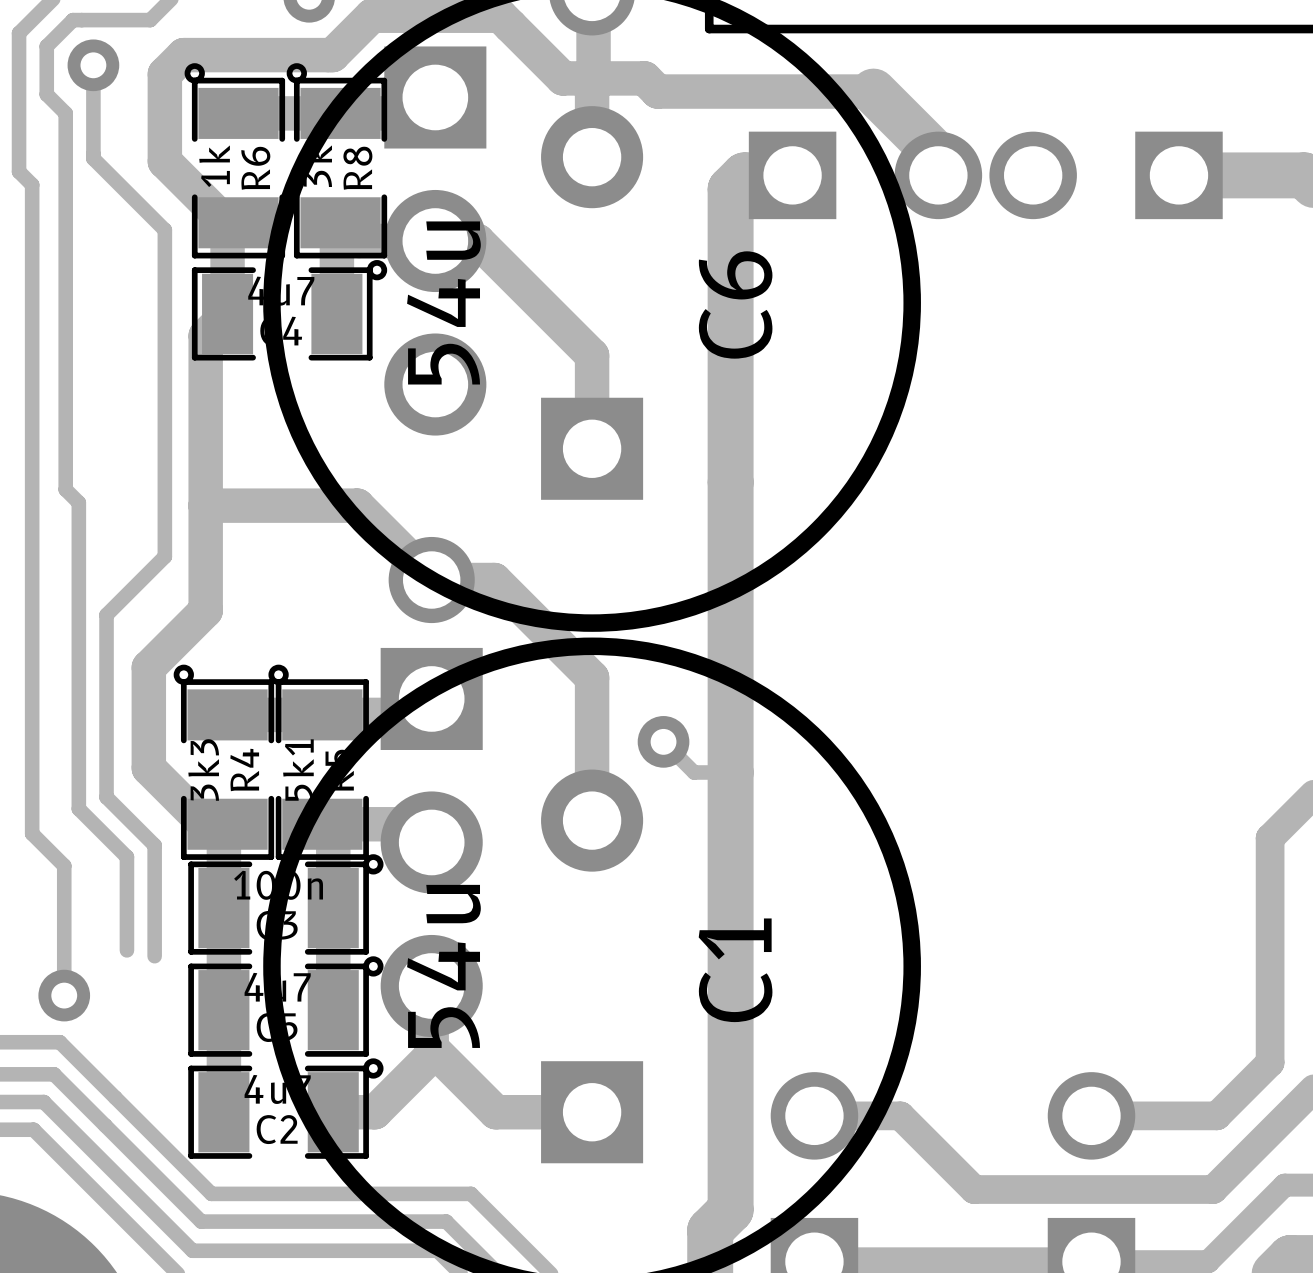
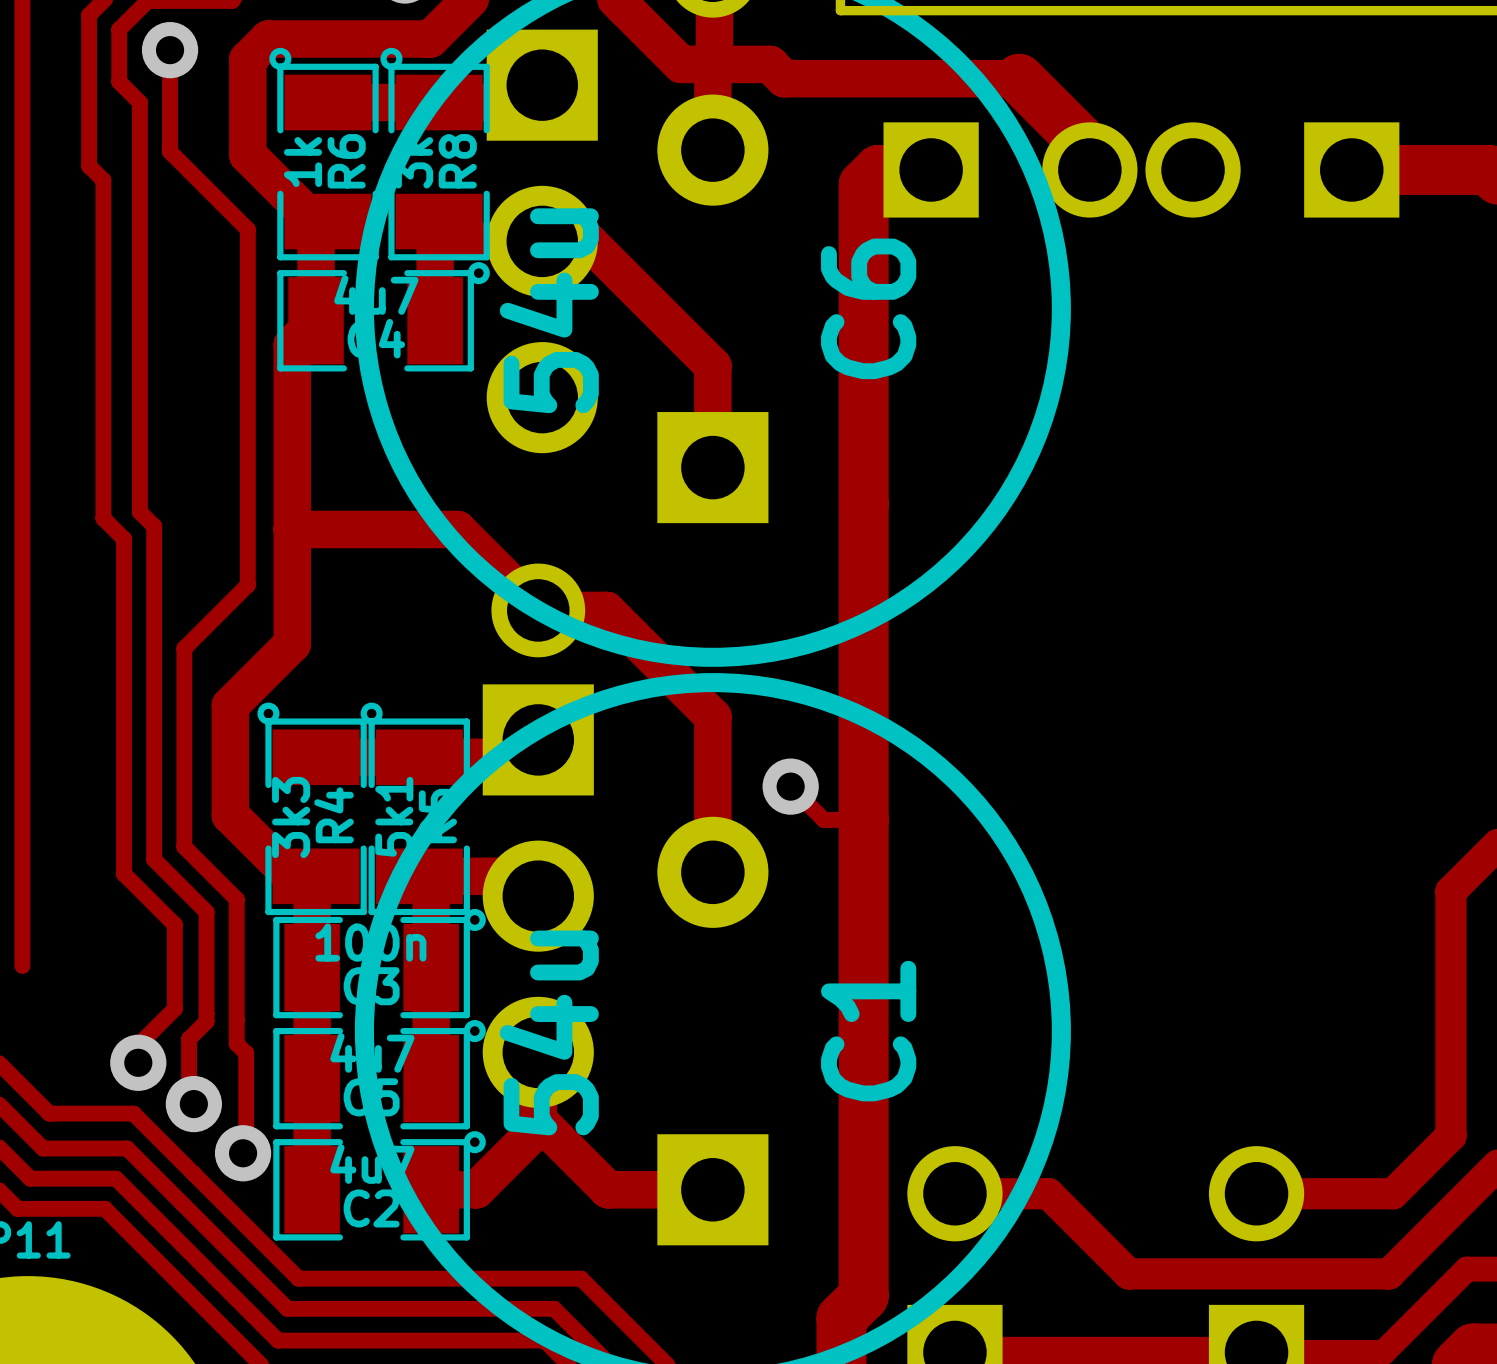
track: (32, 495) (32, 833) (64, 865) (64, 979) -> (103, 518) (124, 539) (124, 873) (174, 924) (174, 1008) (138, 1045)
track: none -> (206, 1013) (206, 1021) (189, 1039) (189, 1099) (193, 1104)
track: none -> (236, 1019) (236, 1043) (246, 1053) (246, 1150) (243, 1153)
via: none -> (193, 1104)
via: none -> (243, 1153)

